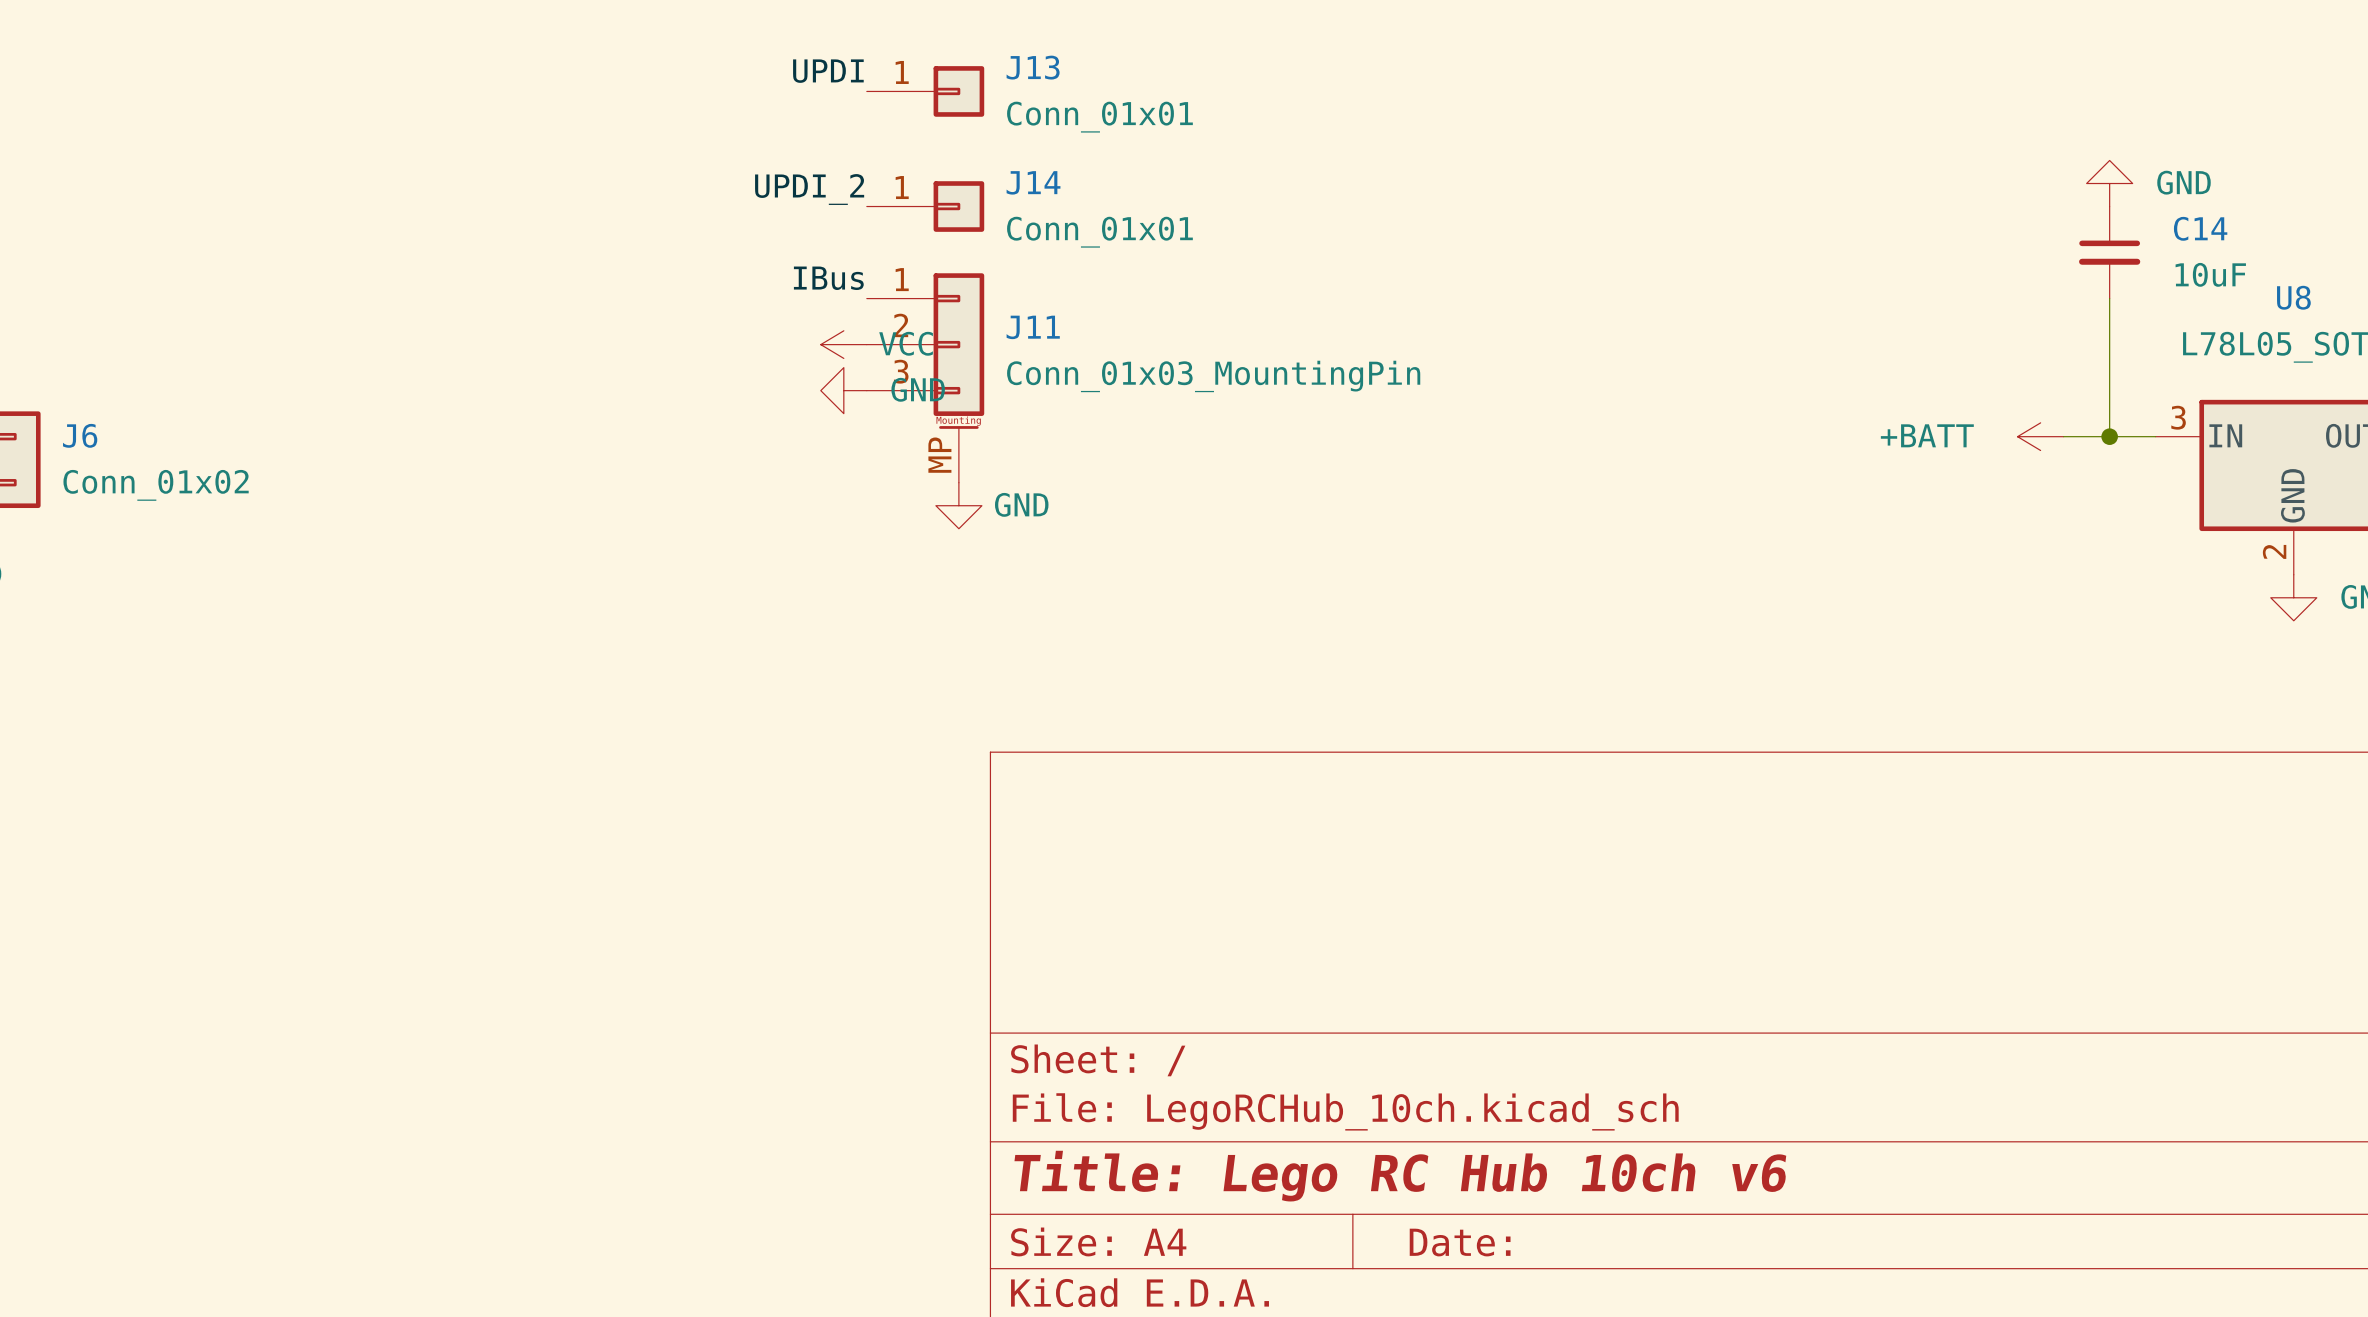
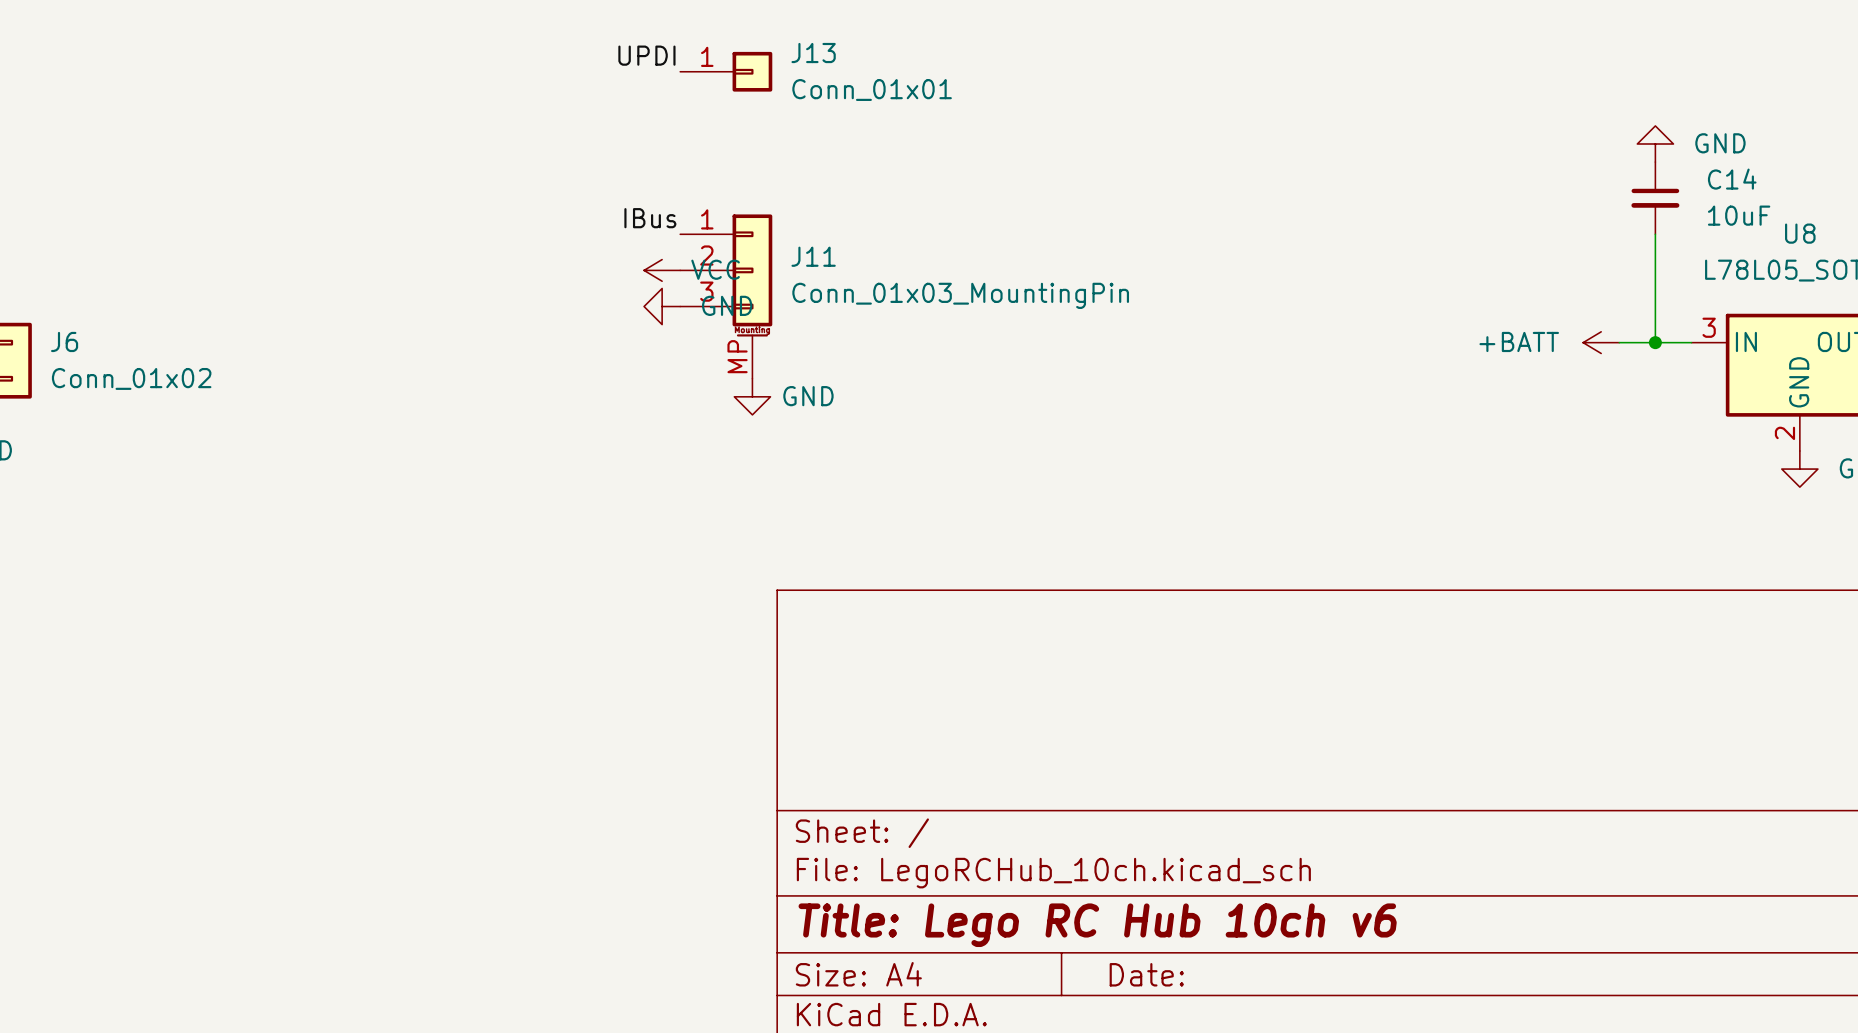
label: UPDI_2 (809, 189) -> none
J14: Conn_01x01 (925, 206) -> none

